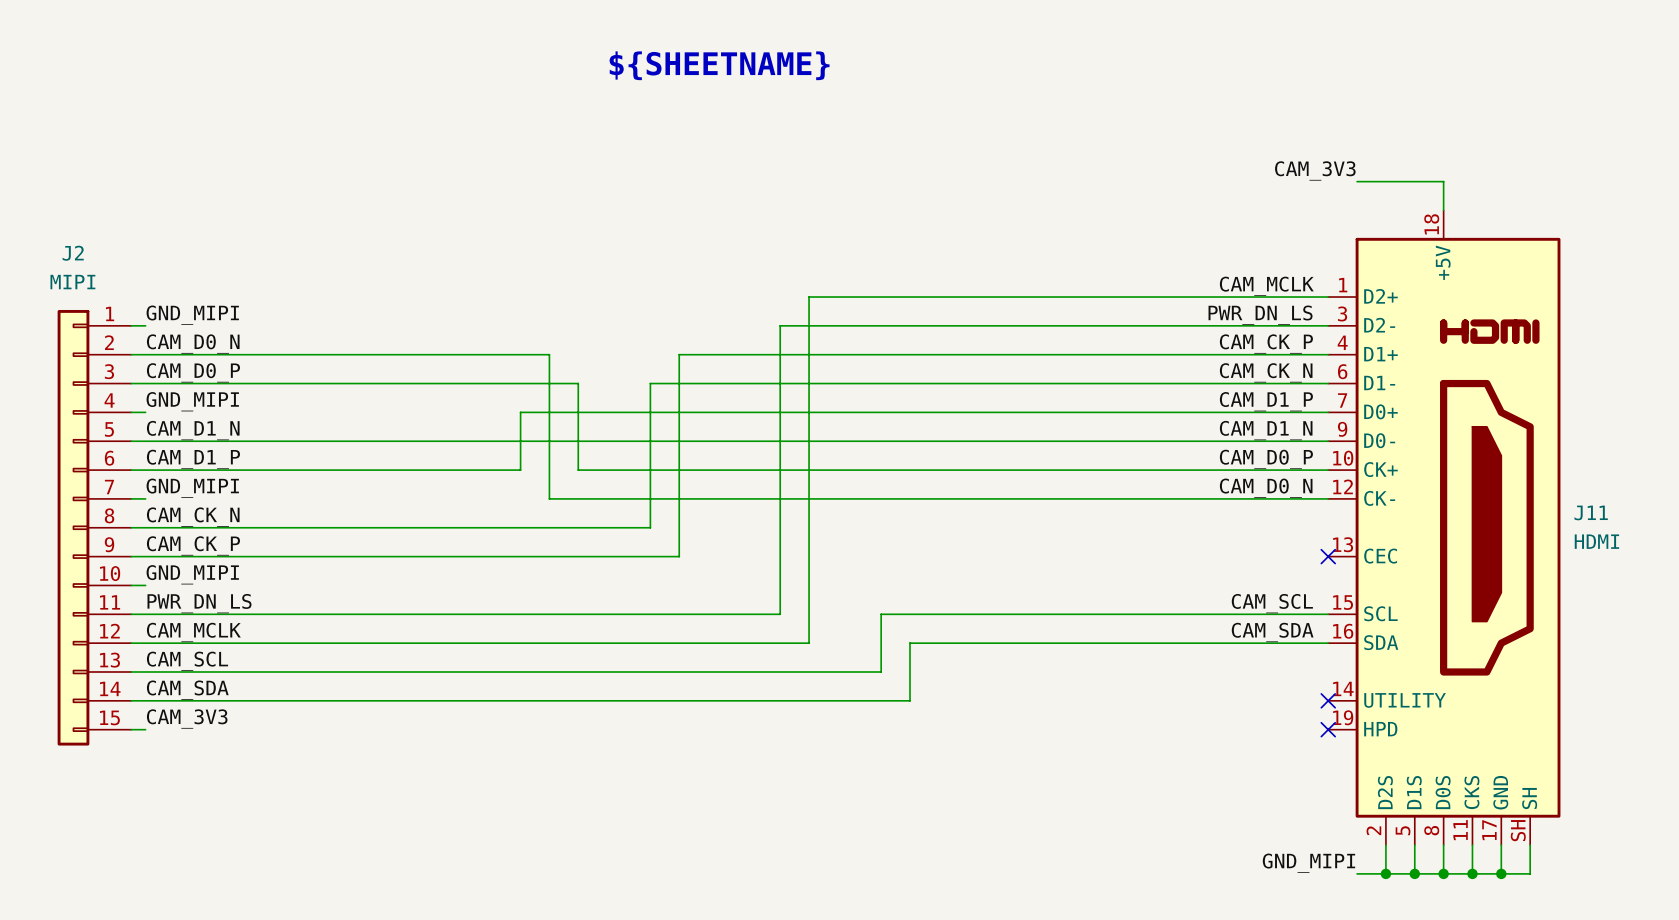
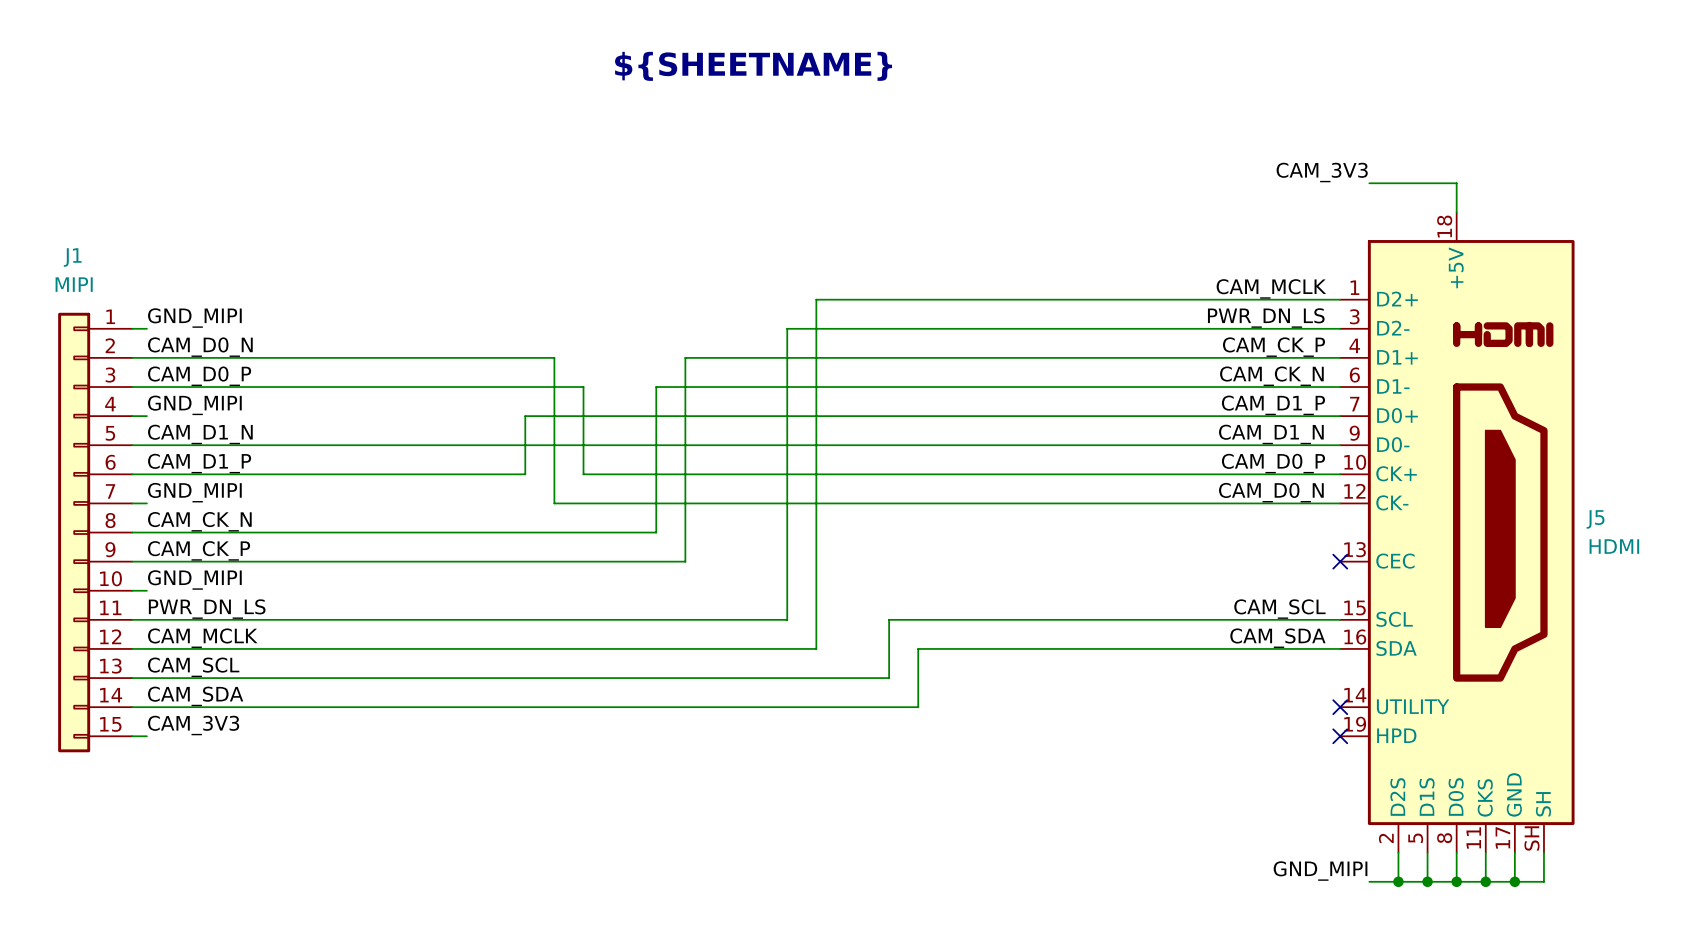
J2 name: J2 (73, 253) -> J1 (72, 257)
J11 name: J11 (1591, 512) -> J5 (1595, 519)

